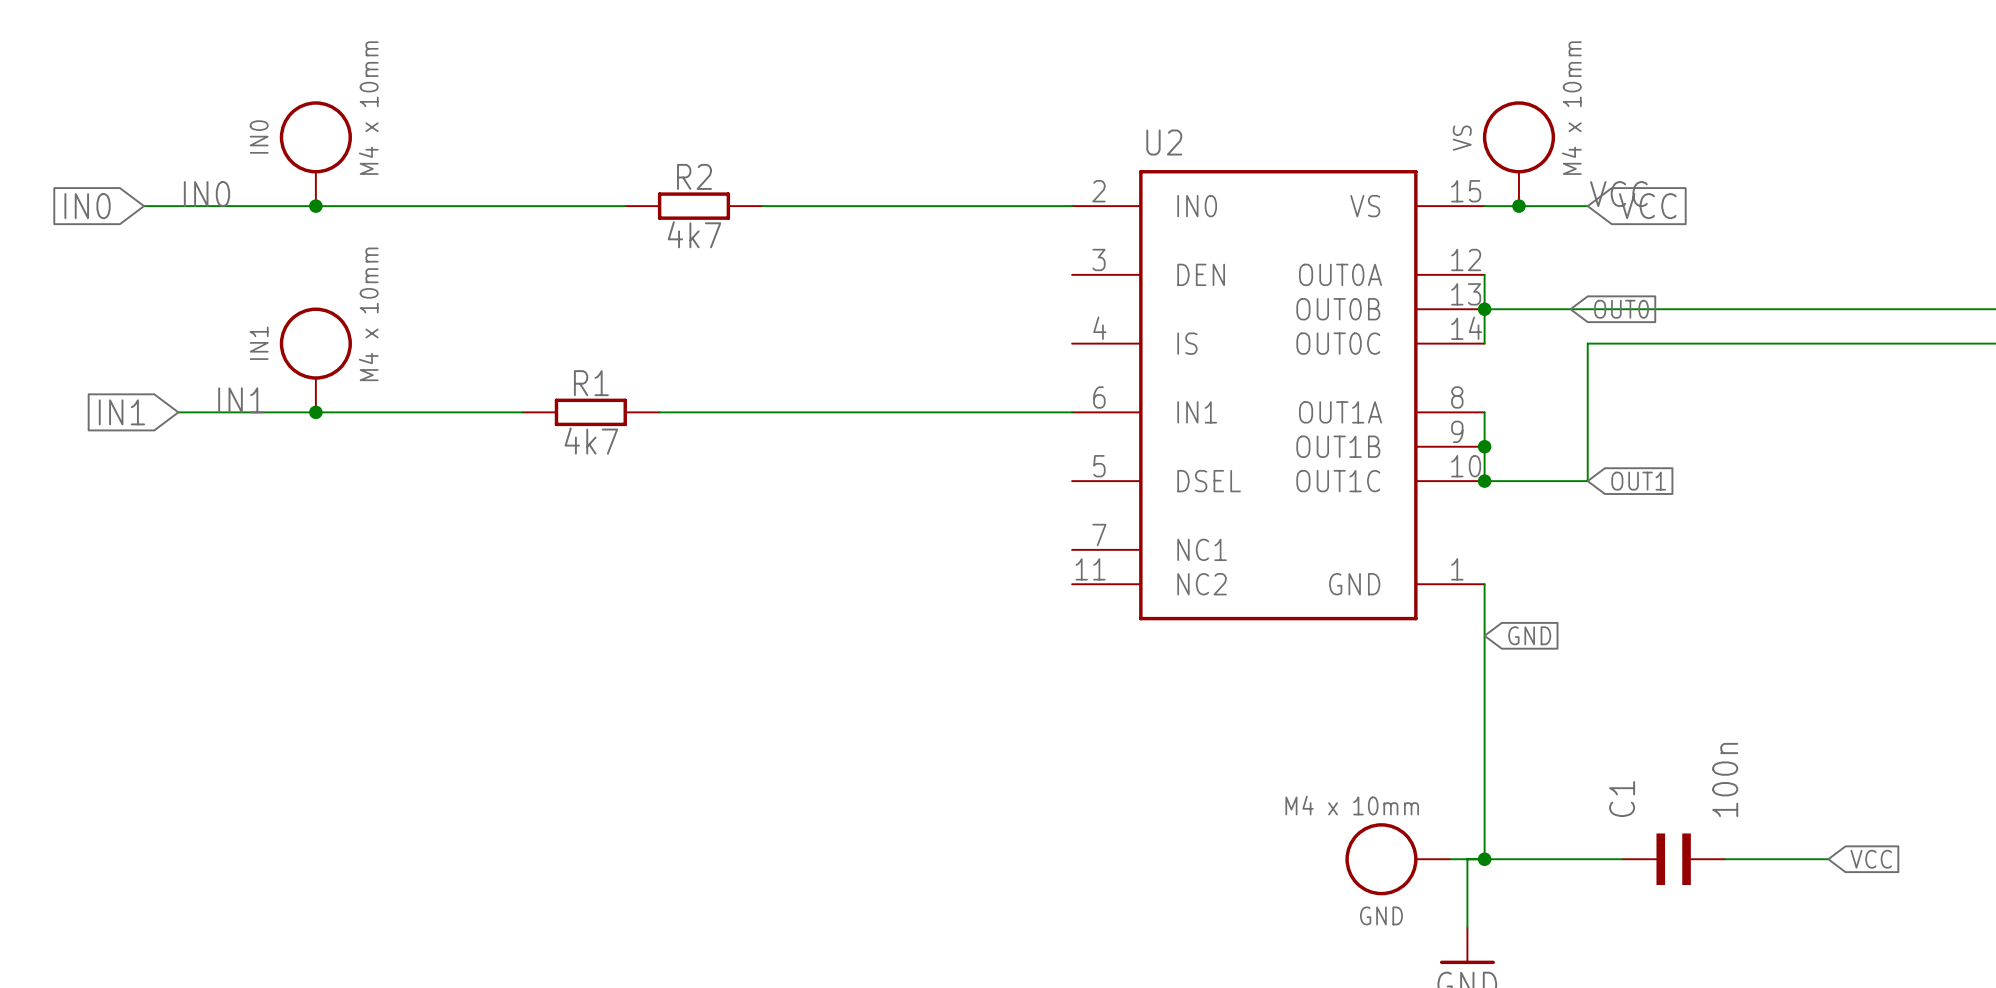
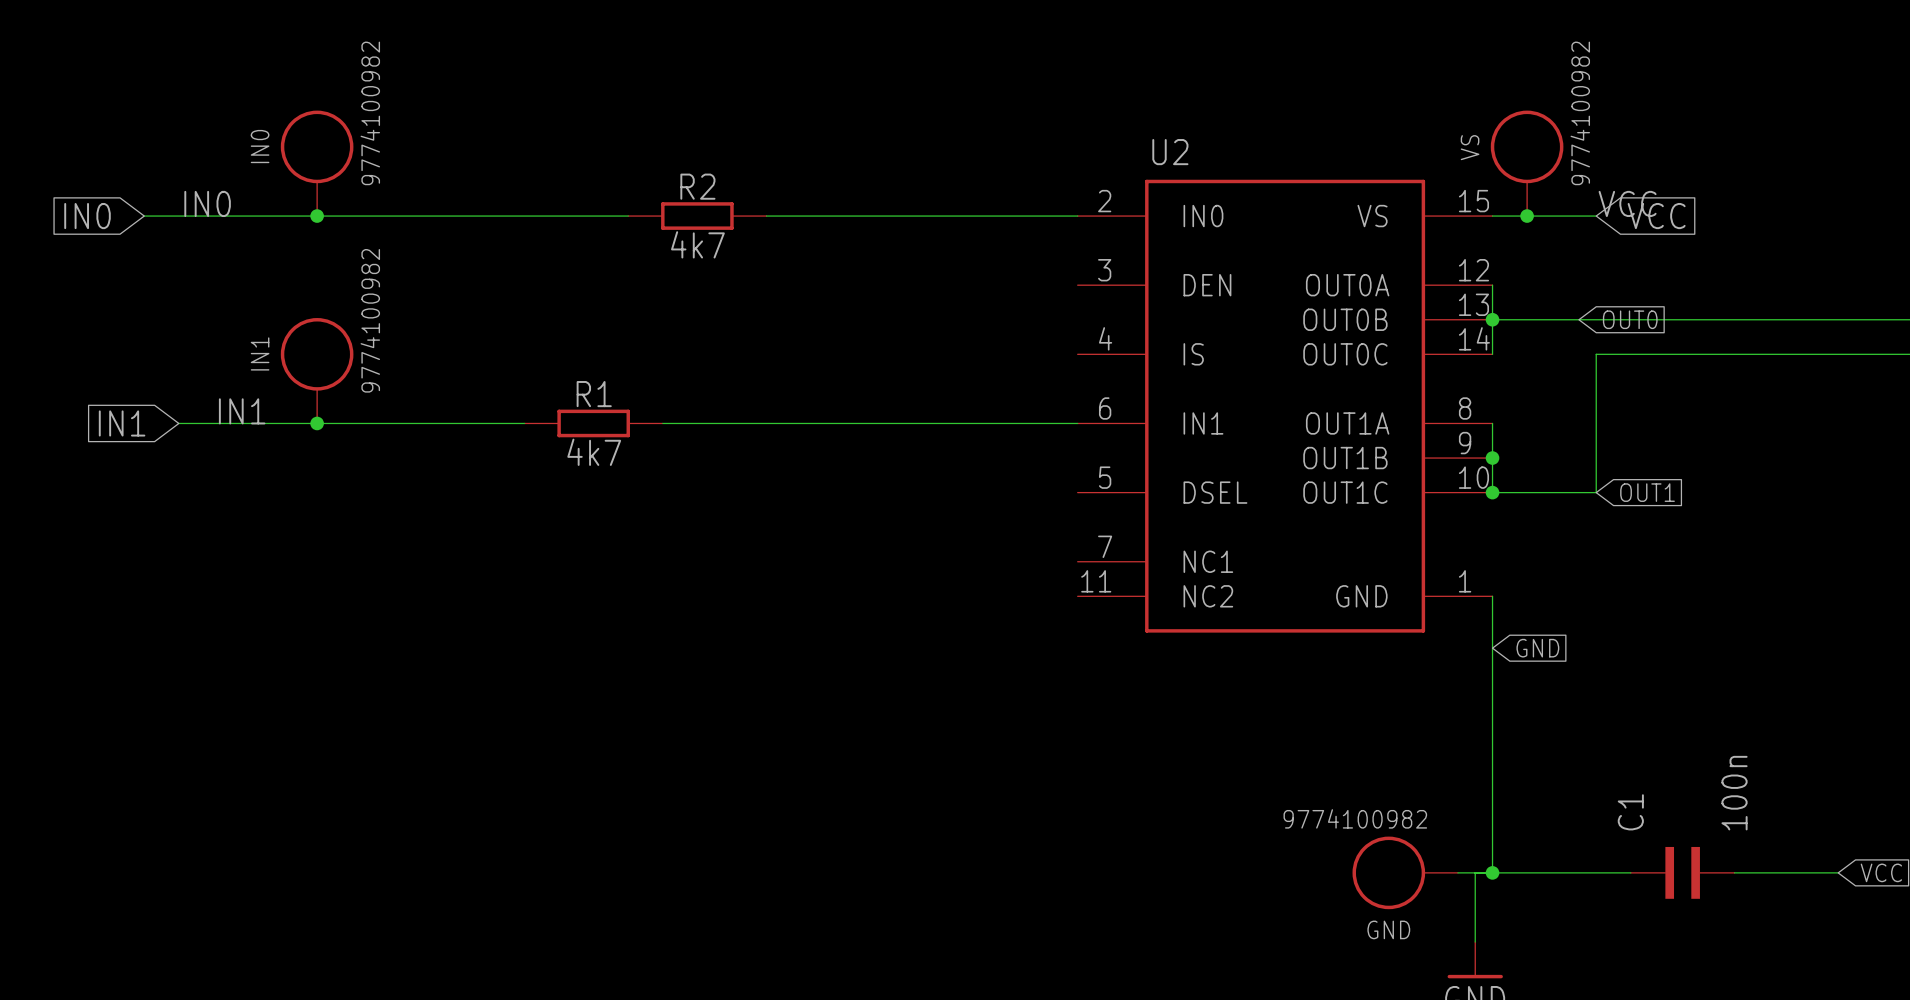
IN0 value: M4 x 10mm (368, 108) -> 9774100982 (370, 113)
VS value: M4 x 10mm (1571, 108) -> 9774100982 (1580, 113)
IN1 value: M4 x 10mm (368, 314) -> 9774100982 (370, 320)
GND value: M4 x 10mm (1352, 805) -> 9774100982 (1355, 818)

